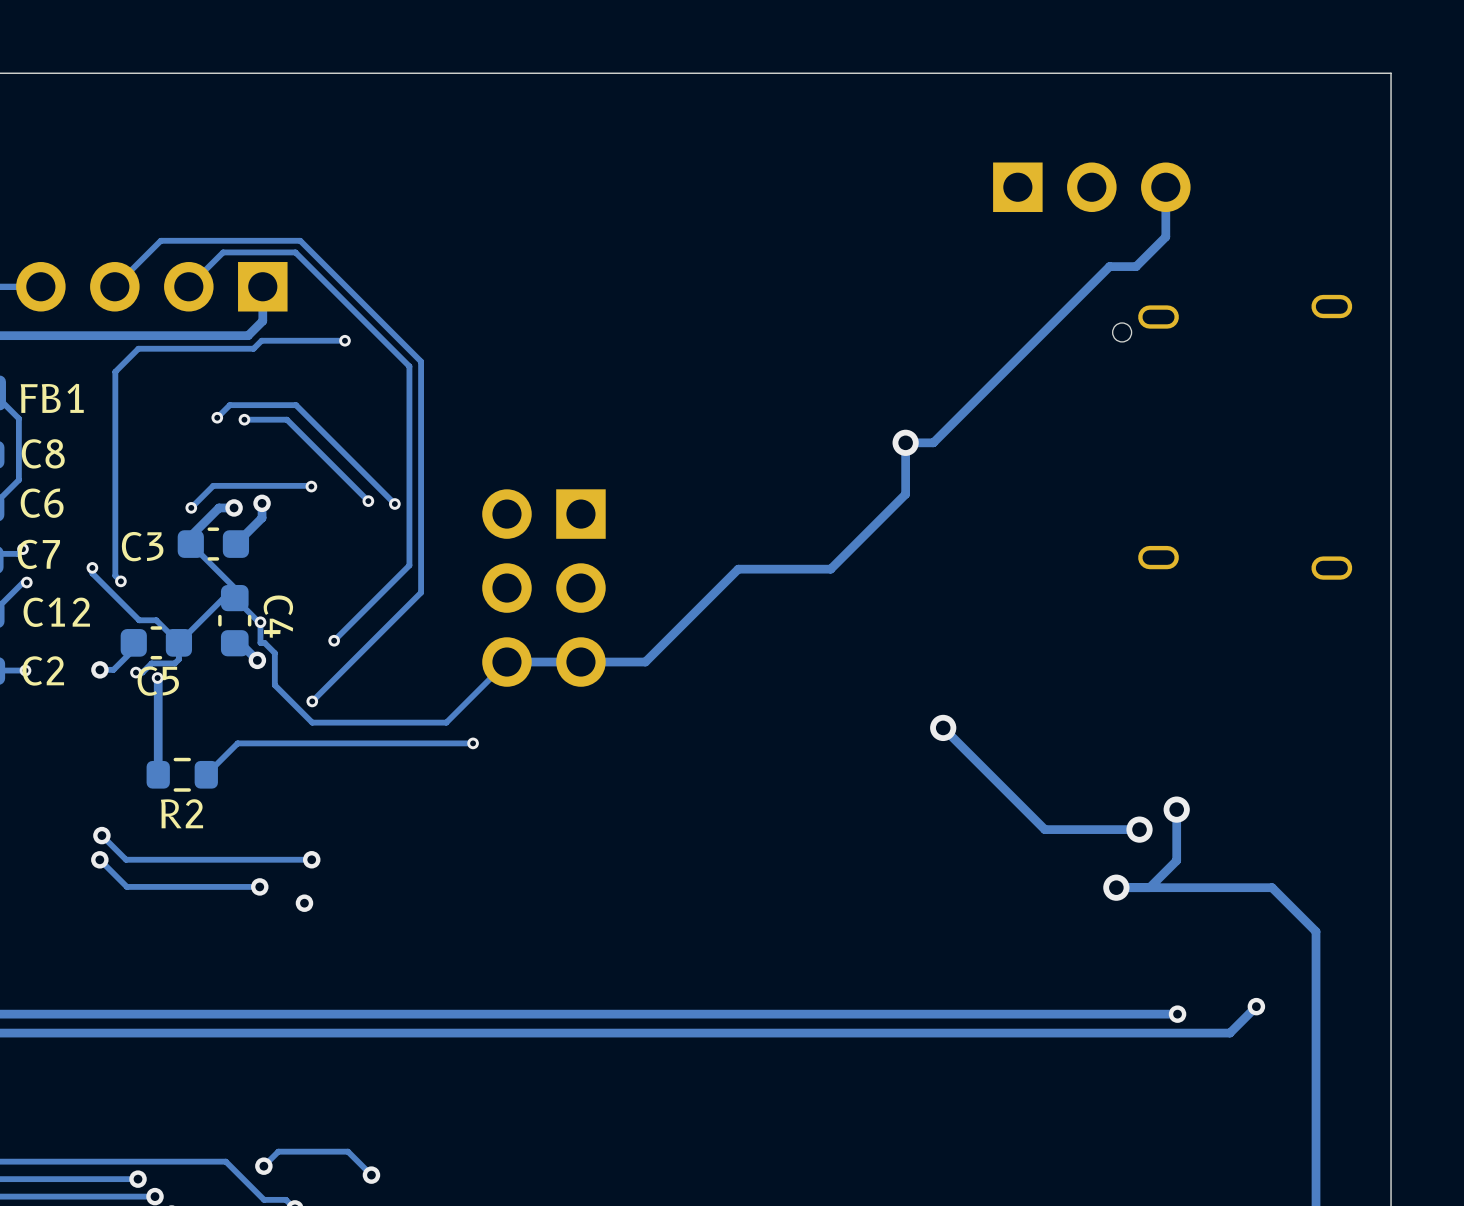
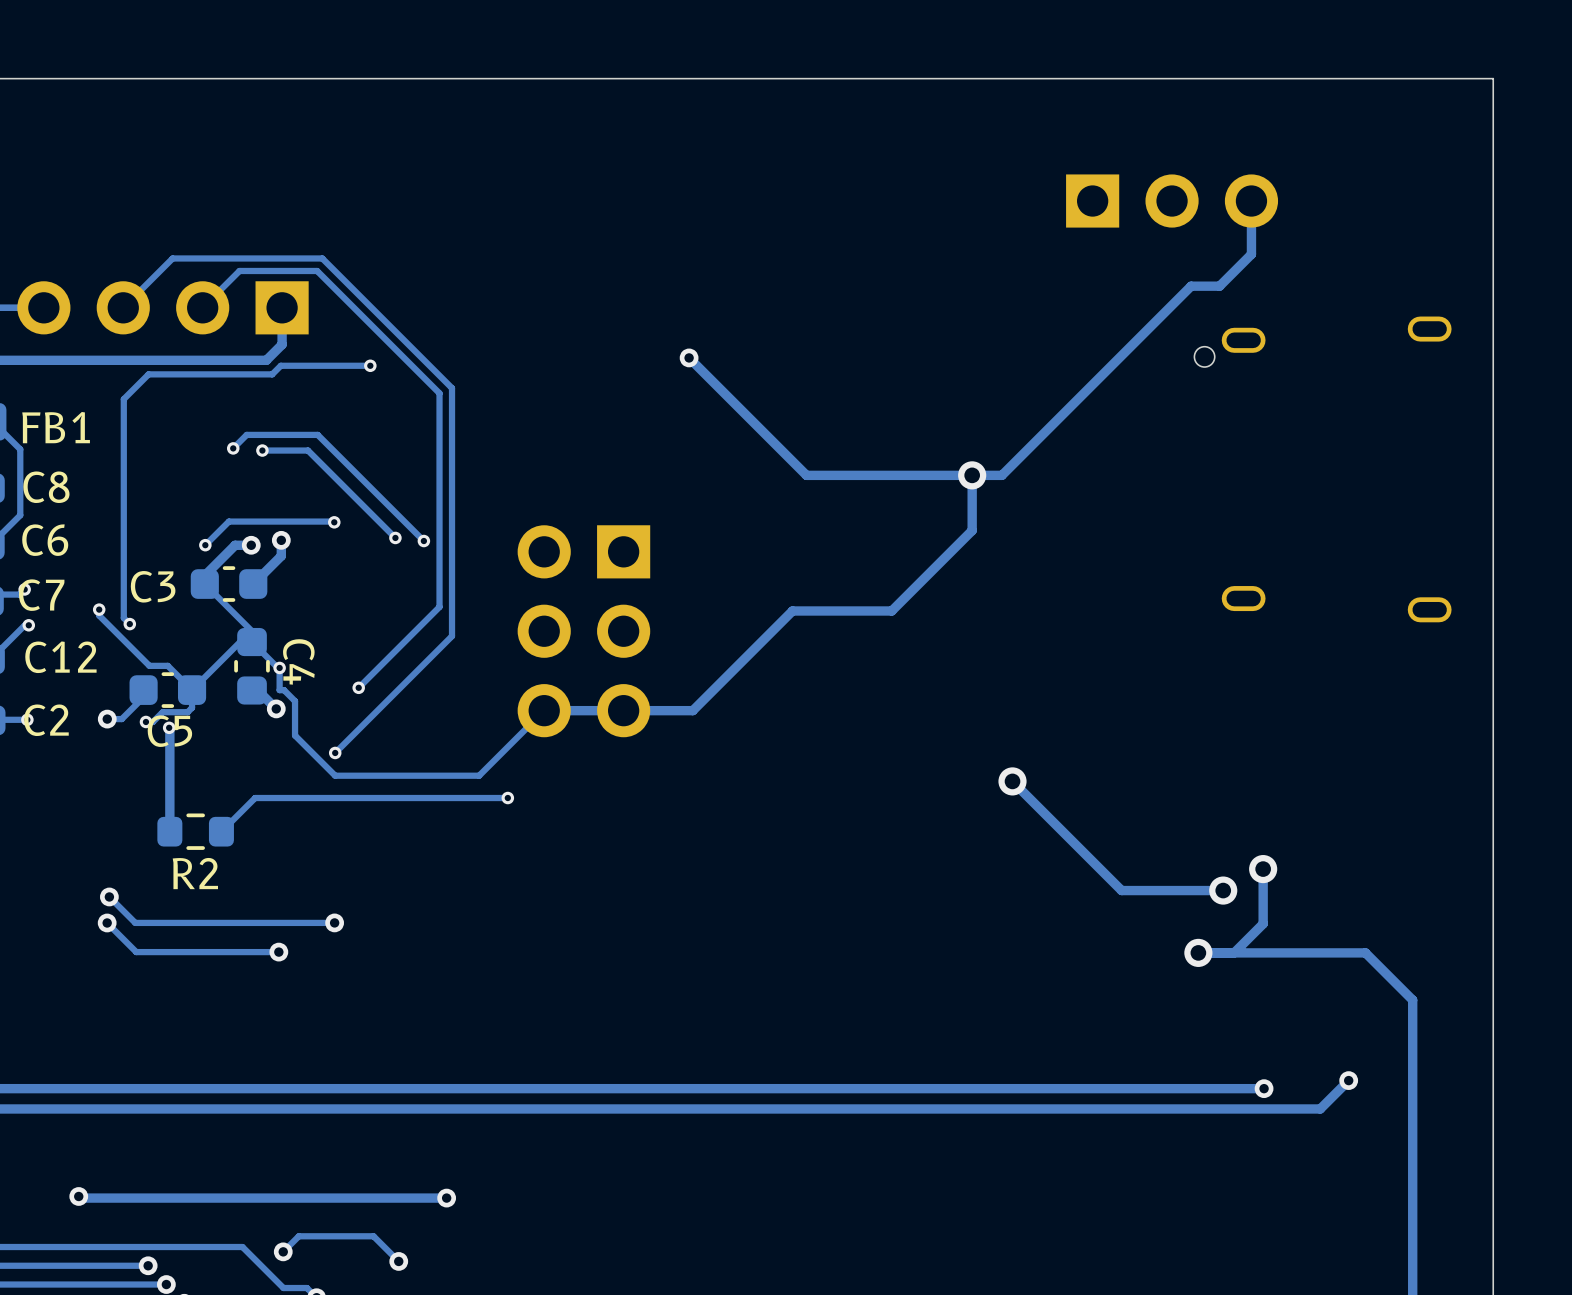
track: none -> (689, 357) (806, 475) (972, 475)
via: none -> (689, 357)
via: (304, 903) -> none
track: none -> (78, 1196) (80, 1198) (446, 1198)
via: none -> (78, 1196)
via: none -> (446, 1198)

